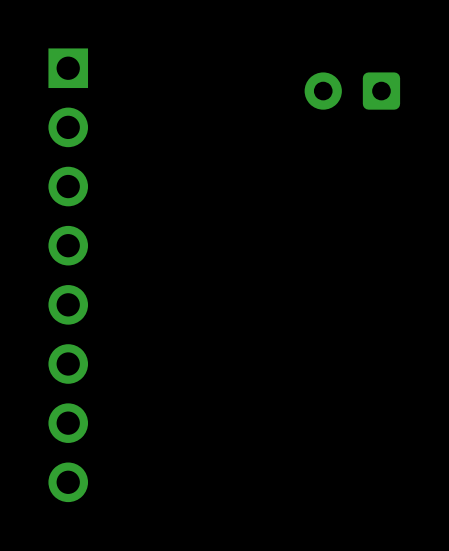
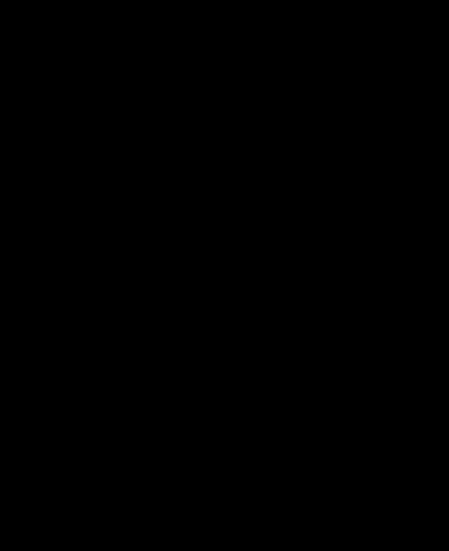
part: (352, 91) -> none
part: (68, 275) -> none

